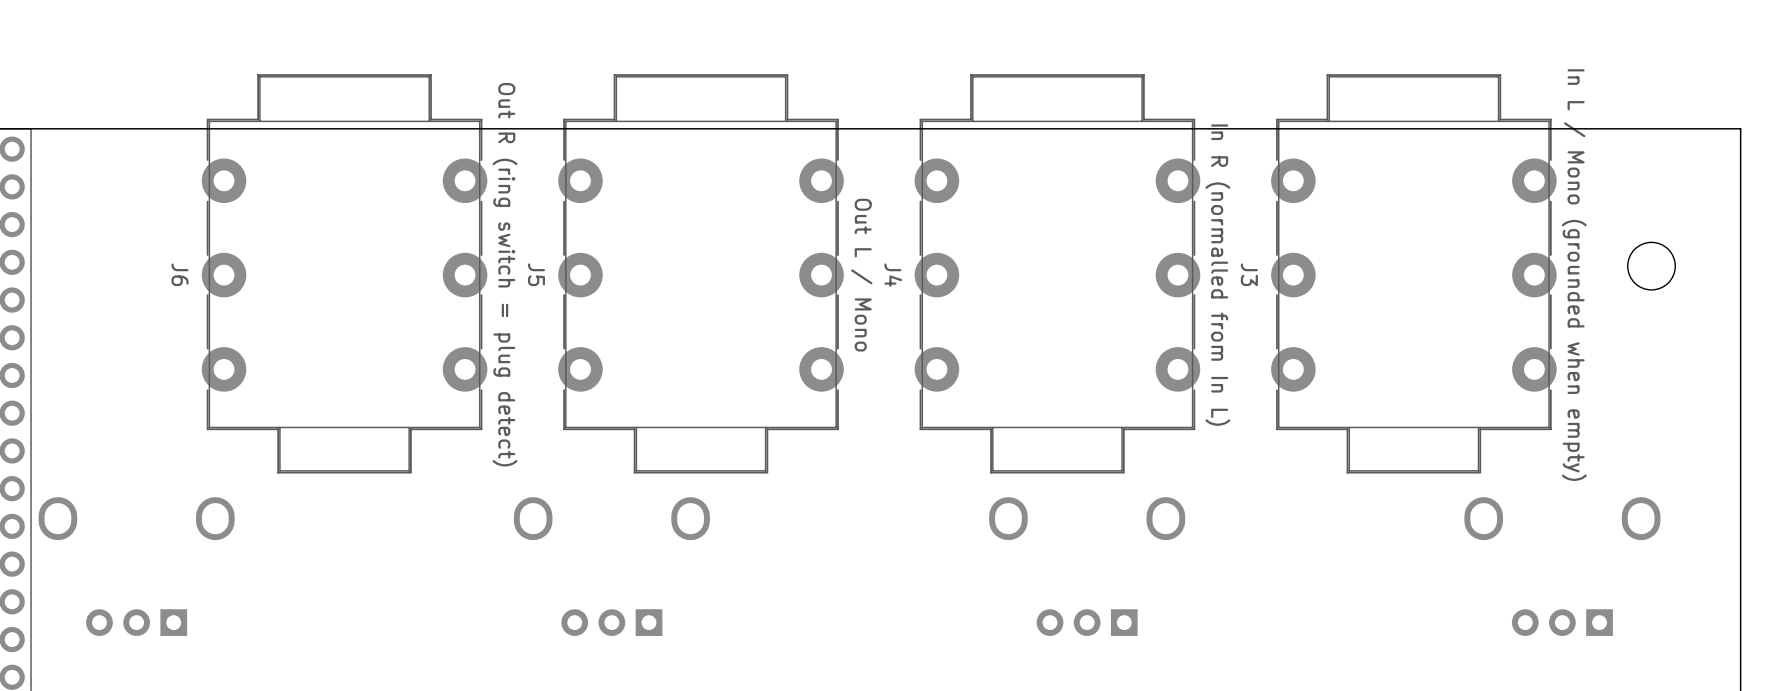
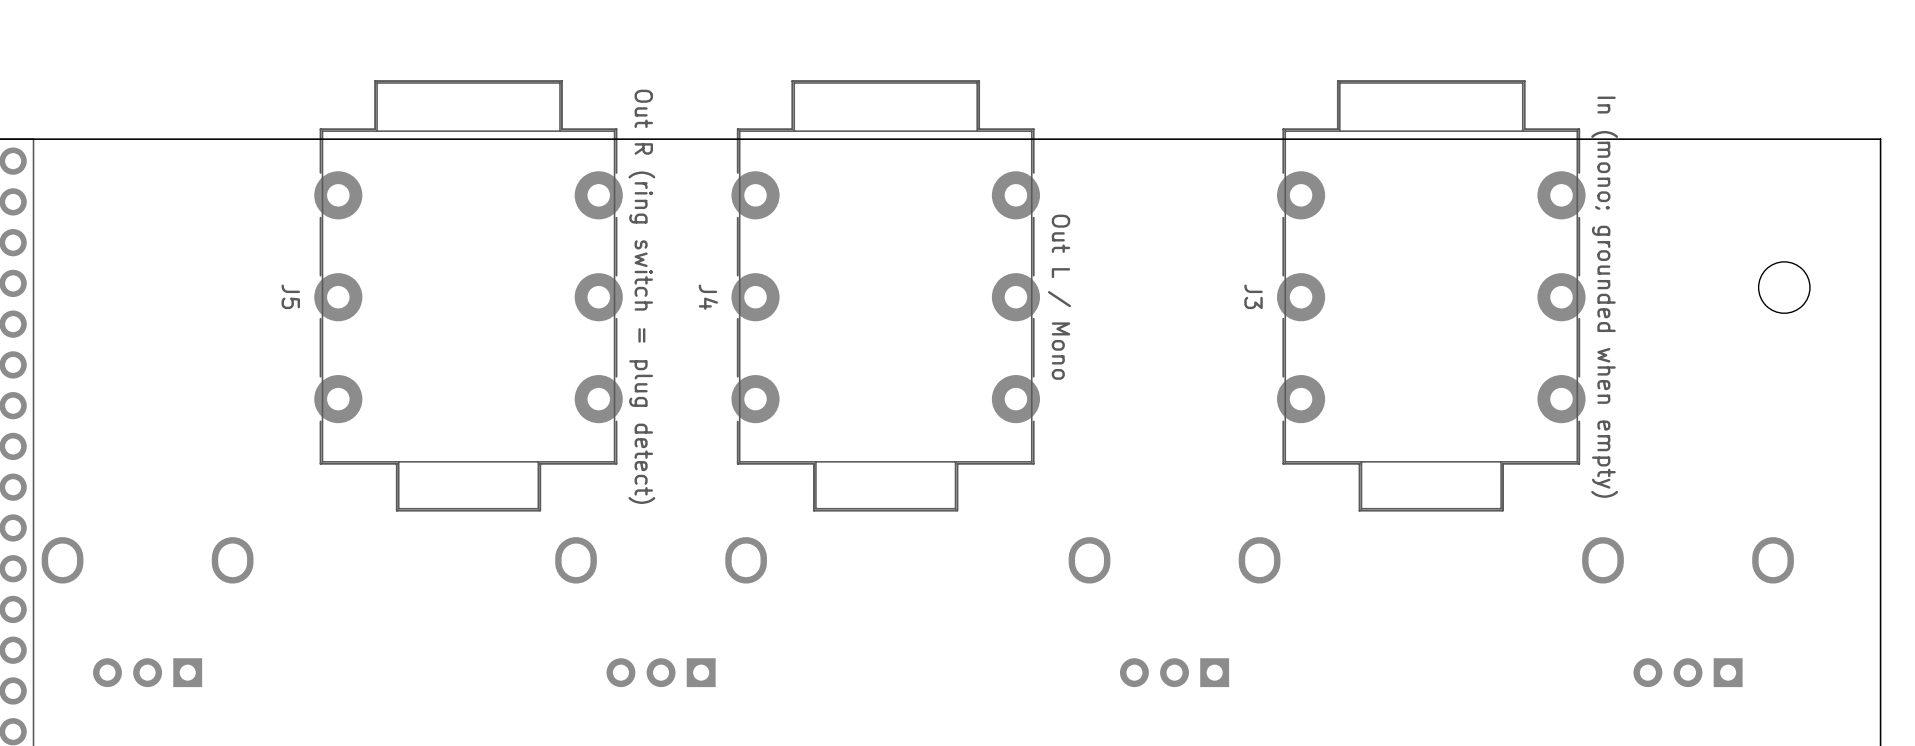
J6: Out R (ring switch = plug detect) (344, 273) -> none
J5 position: (700, 273) -> (468, 295)
J4 position: (1057, 273) -> (885, 295)
J3 position: (1413, 273) -> (1431, 295)
J5 value: Out L / Mono (861, 275) -> Out R (ring switch = plug detect) (641, 296)
J4 value: In R (normalled from In L) (1217, 275) -> Out L / Mono (1059, 297)
J3 value: In L / Mono (grounded when empty) (1574, 275) -> In (mono; grounded when empty) (1604, 297)

